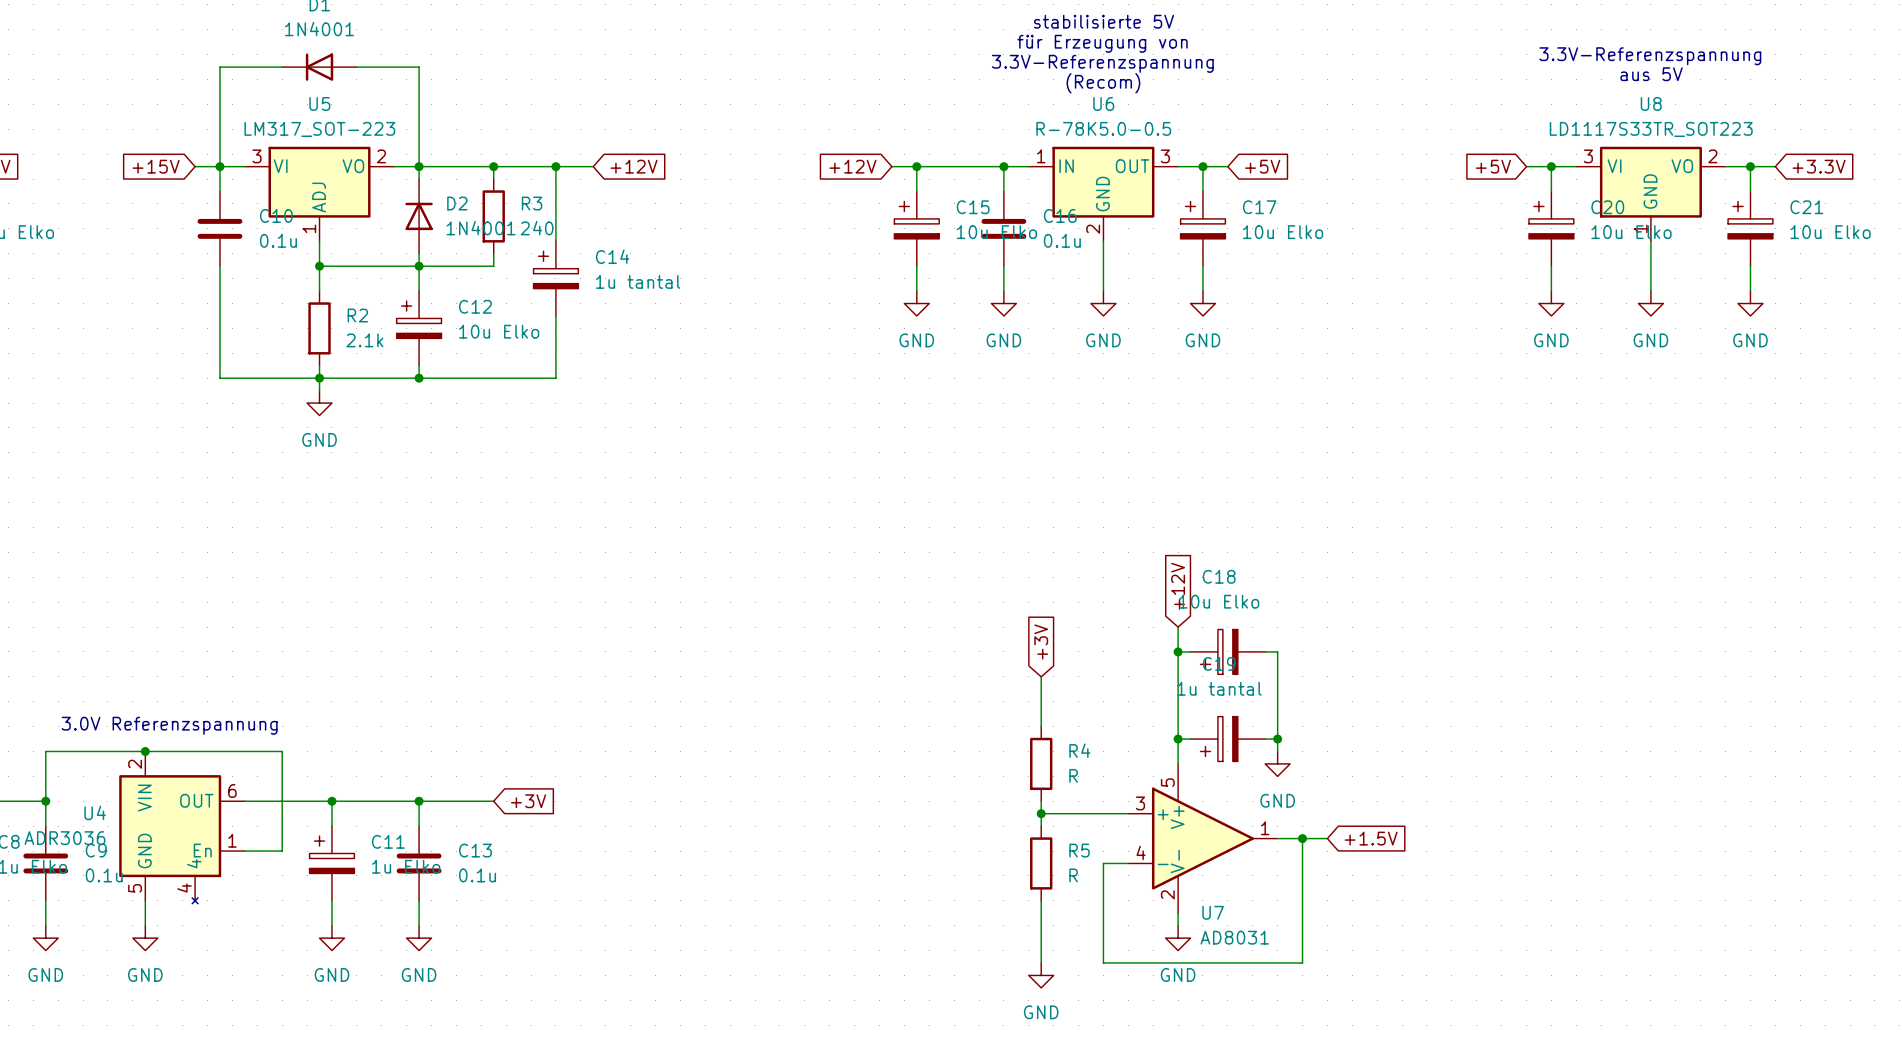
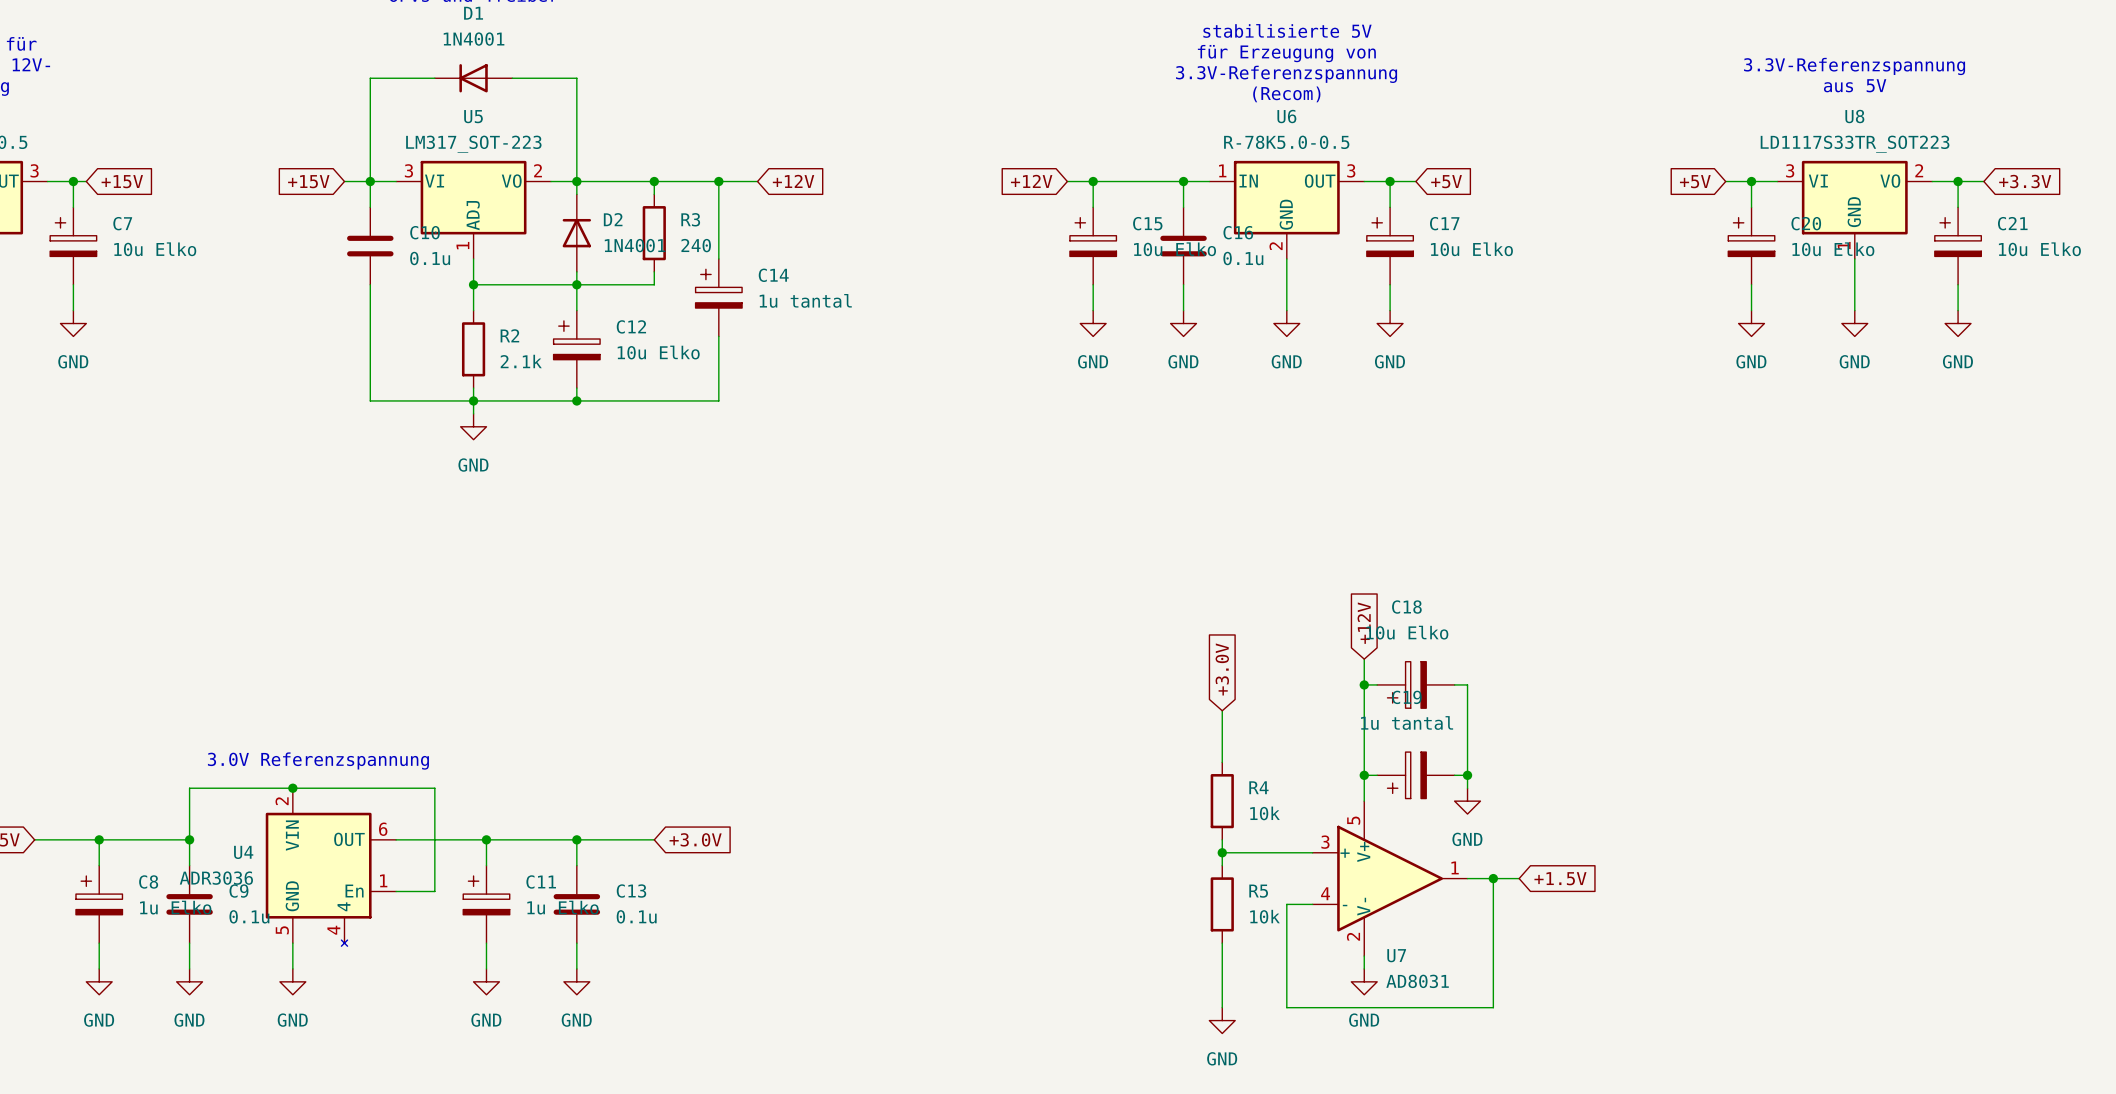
global label: +3V (1041, 641) -> +3.0V (1222, 669)
R4 value: R (1073, 775) -> 10k (1265, 813)
global label: +3V (528, 801) -> +3.0V (695, 839)
R5 value: R (1073, 875) -> 10k (1265, 916)

